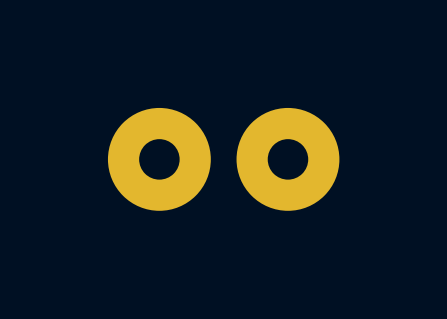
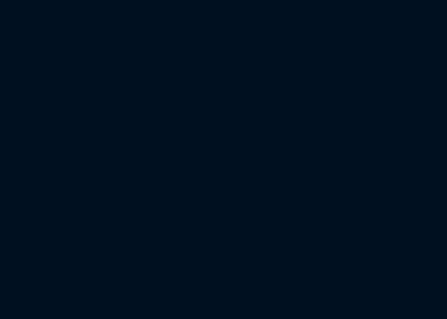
part: (223, 159) -> none

